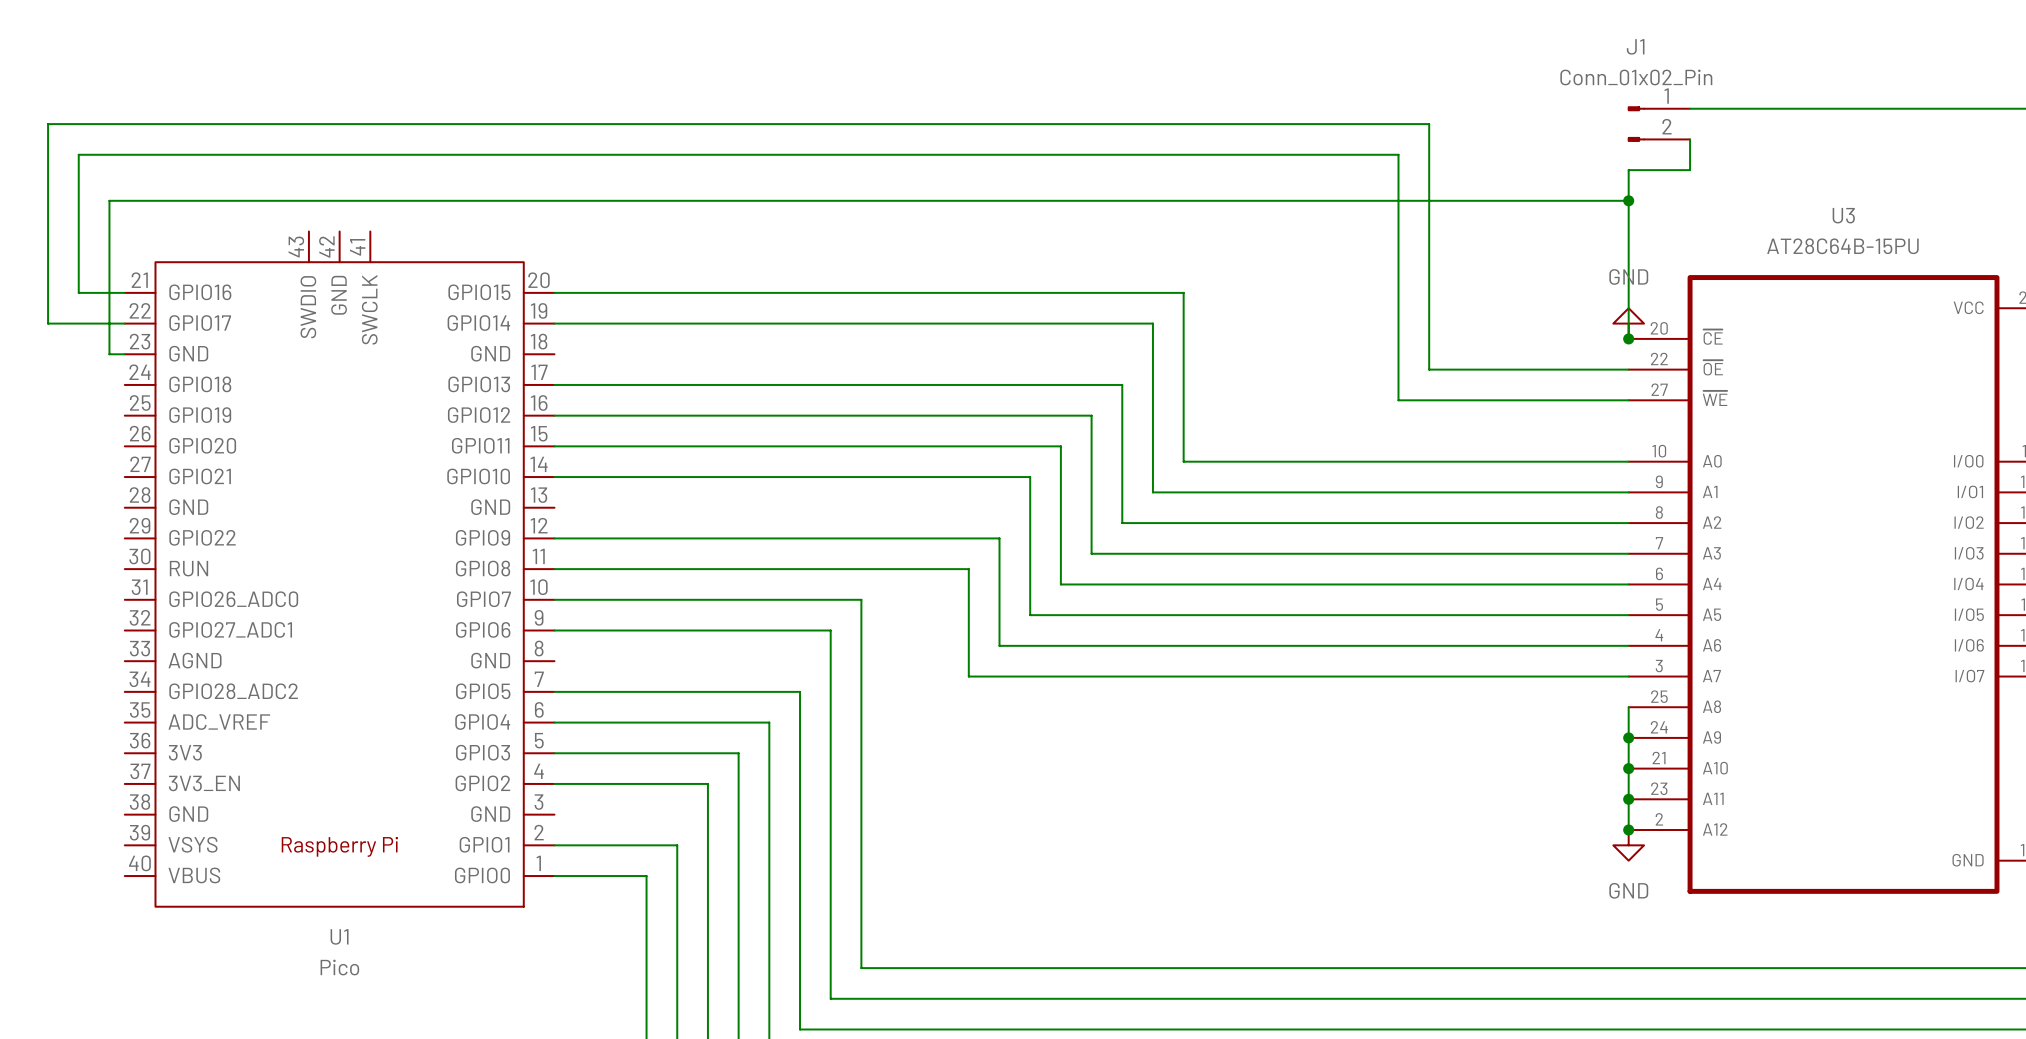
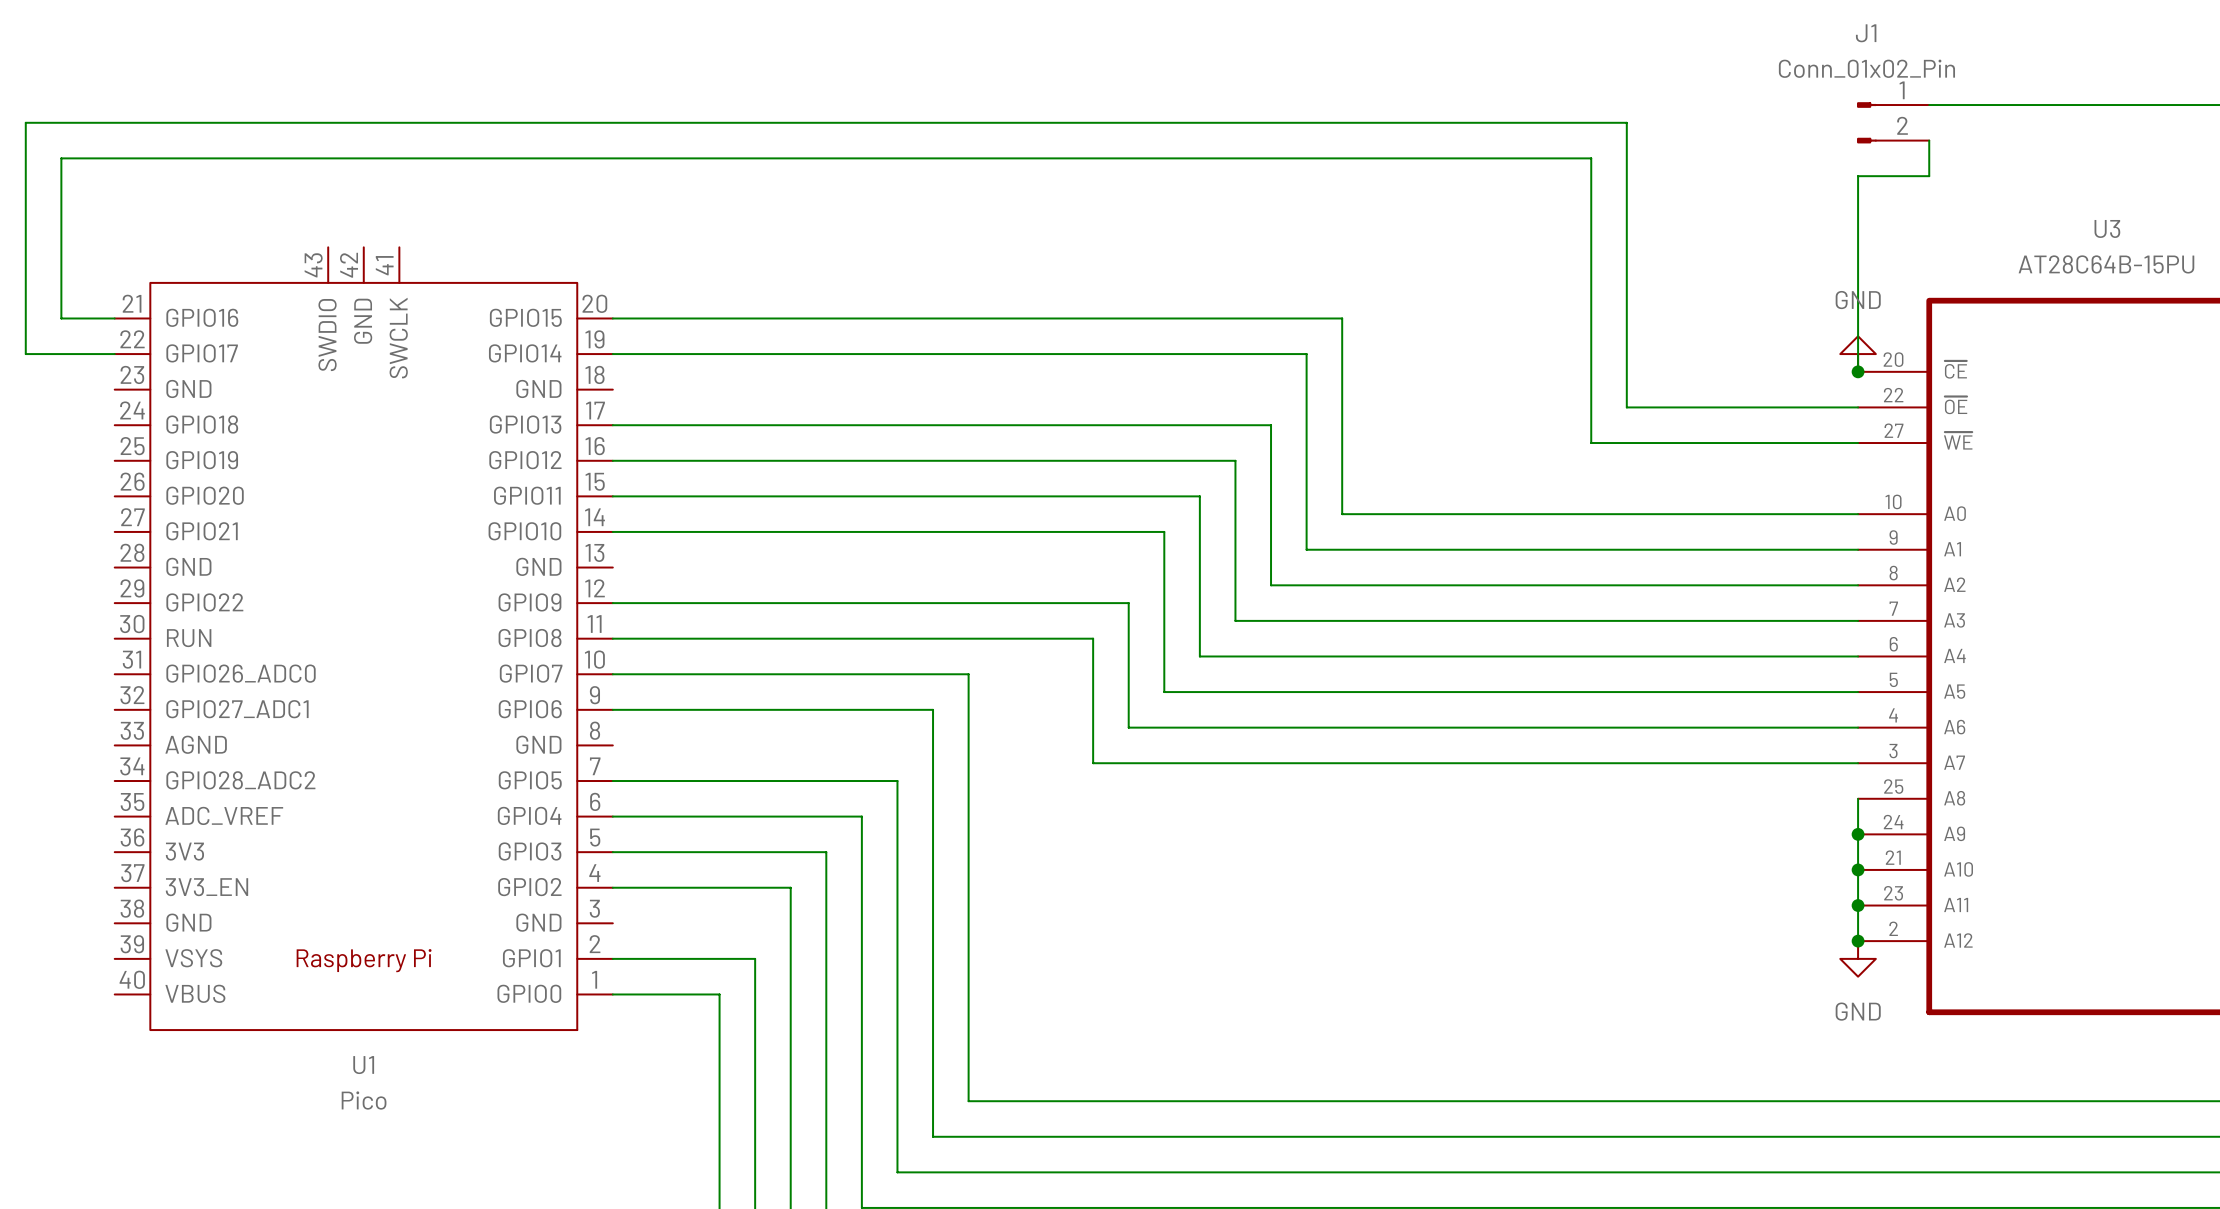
wire: (1628, 200) (109, 200) (109, 354) (124, 354) -> none
junction: (1628, 200) -> none

